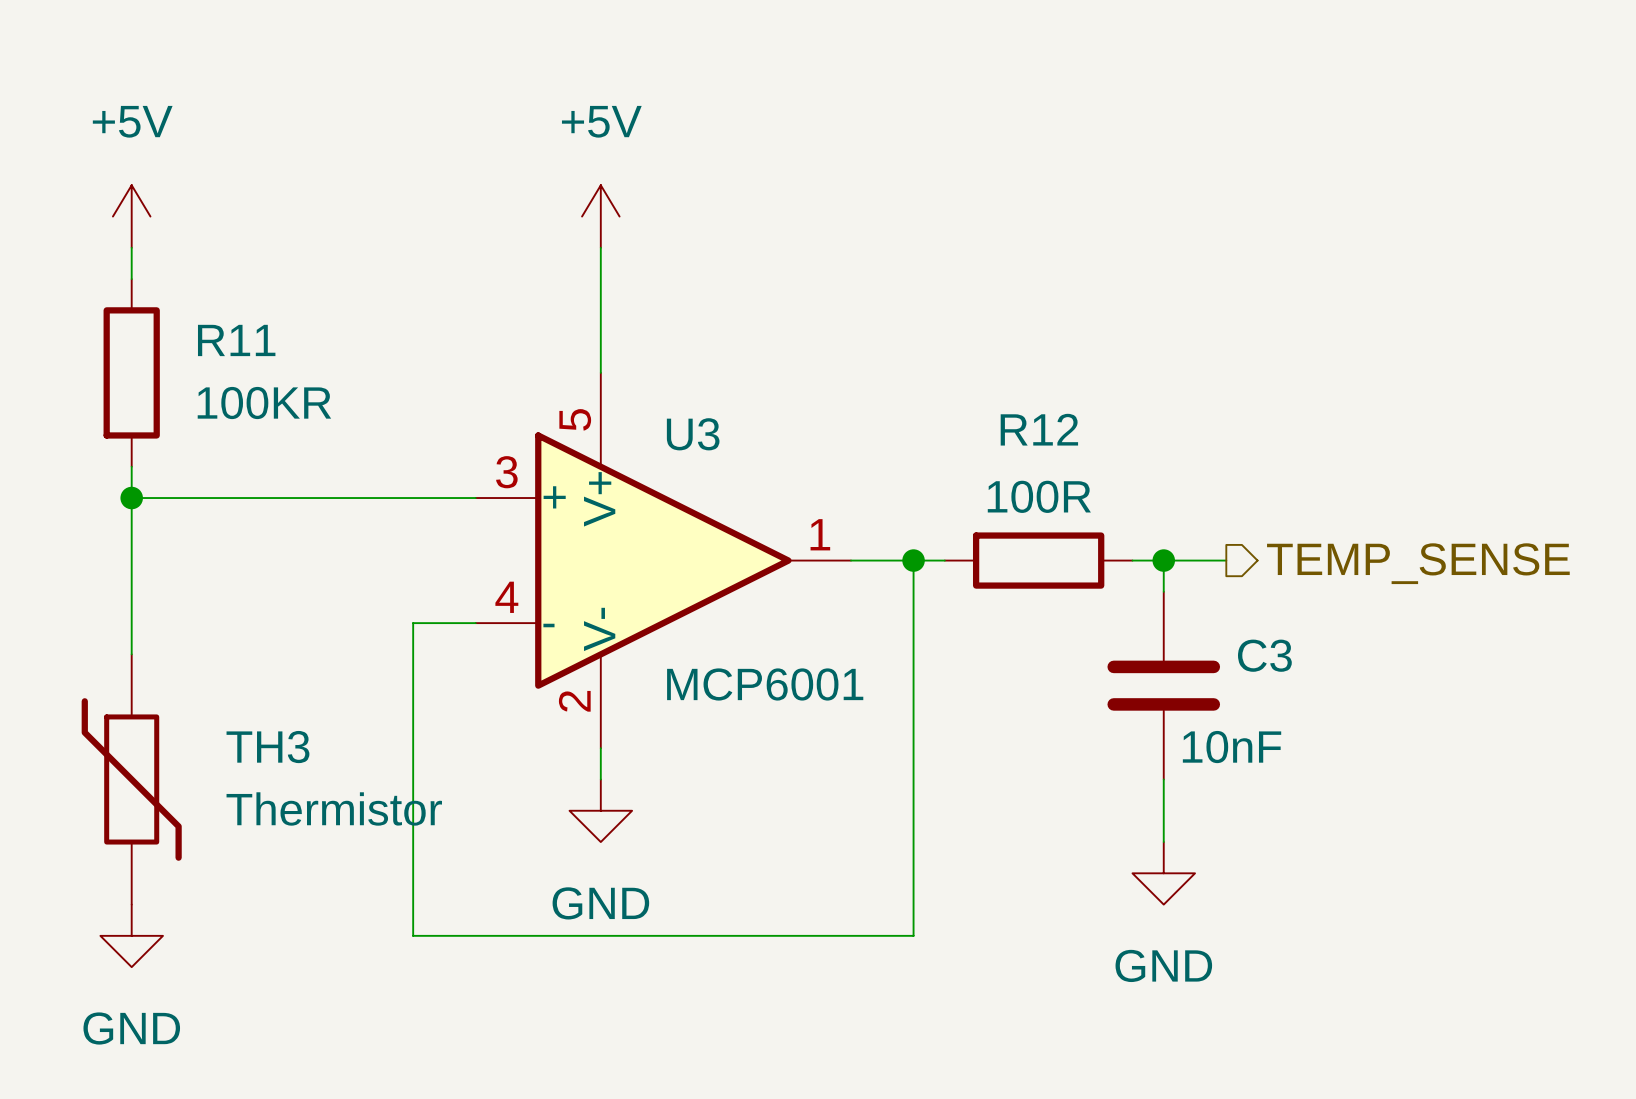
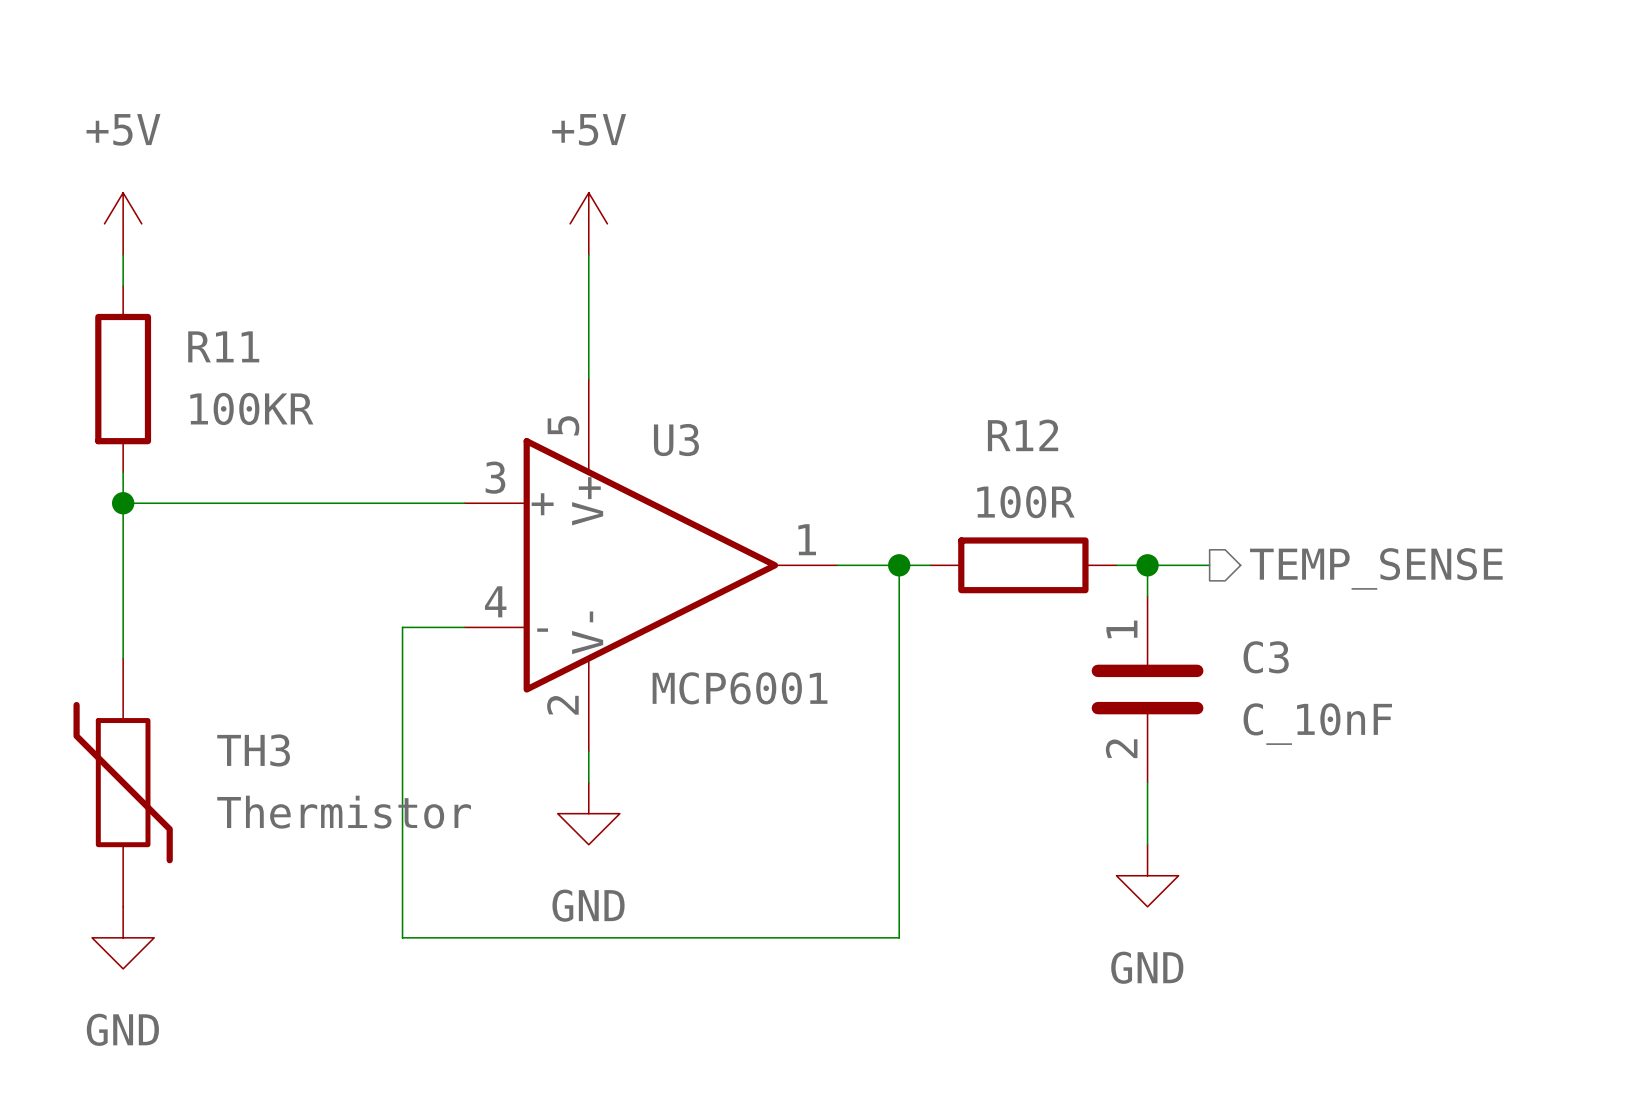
C3 pin number: none -> 1 (1121, 629)
C3 name position: C3 (1264, 655) -> C3 (1266, 657)
C3 pin number: none -> 2 (1121, 748)
C3 value: 10nF (1232, 747) -> C_10nF (1317, 724)

